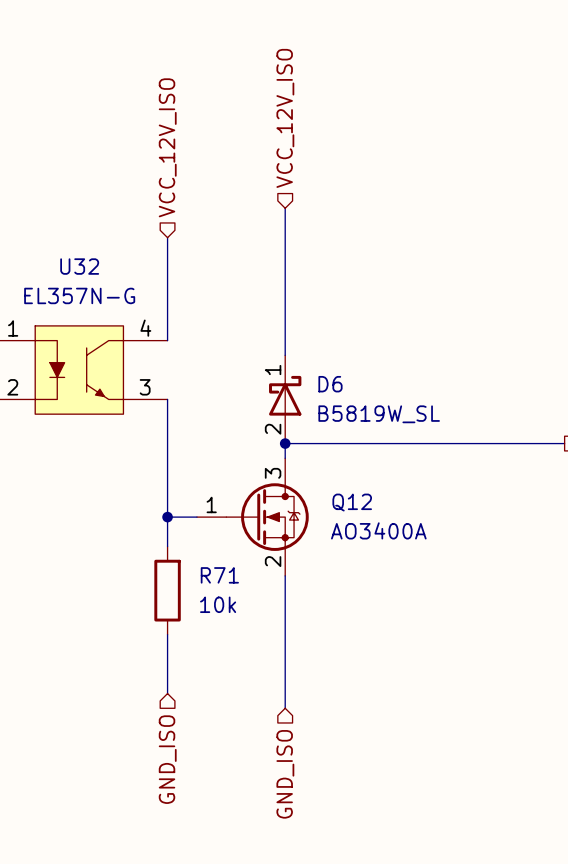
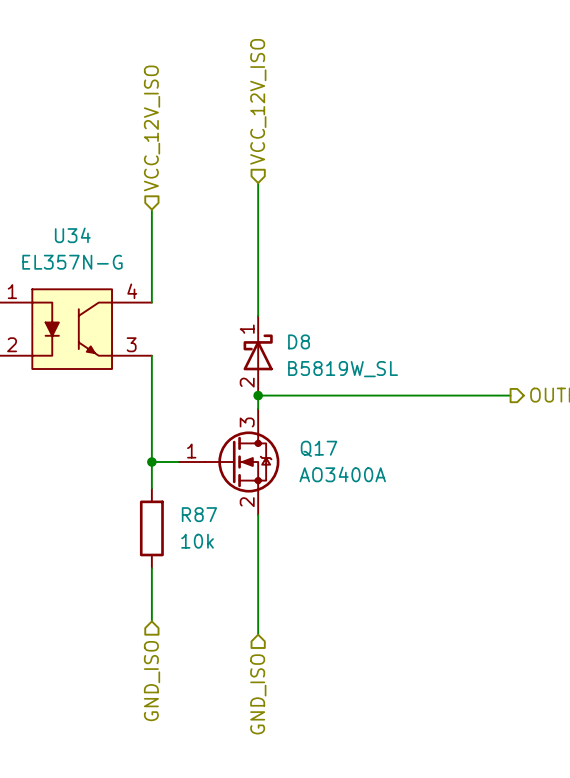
U32 name: U32 (79, 266) -> U34 (72, 235)
D6 name: D6 (330, 384) -> D8 (299, 341)
Q12 name: Q12 (352, 502) -> Q17 (318, 448)
R71 name: R71 (219, 575) -> R87 (199, 514)

